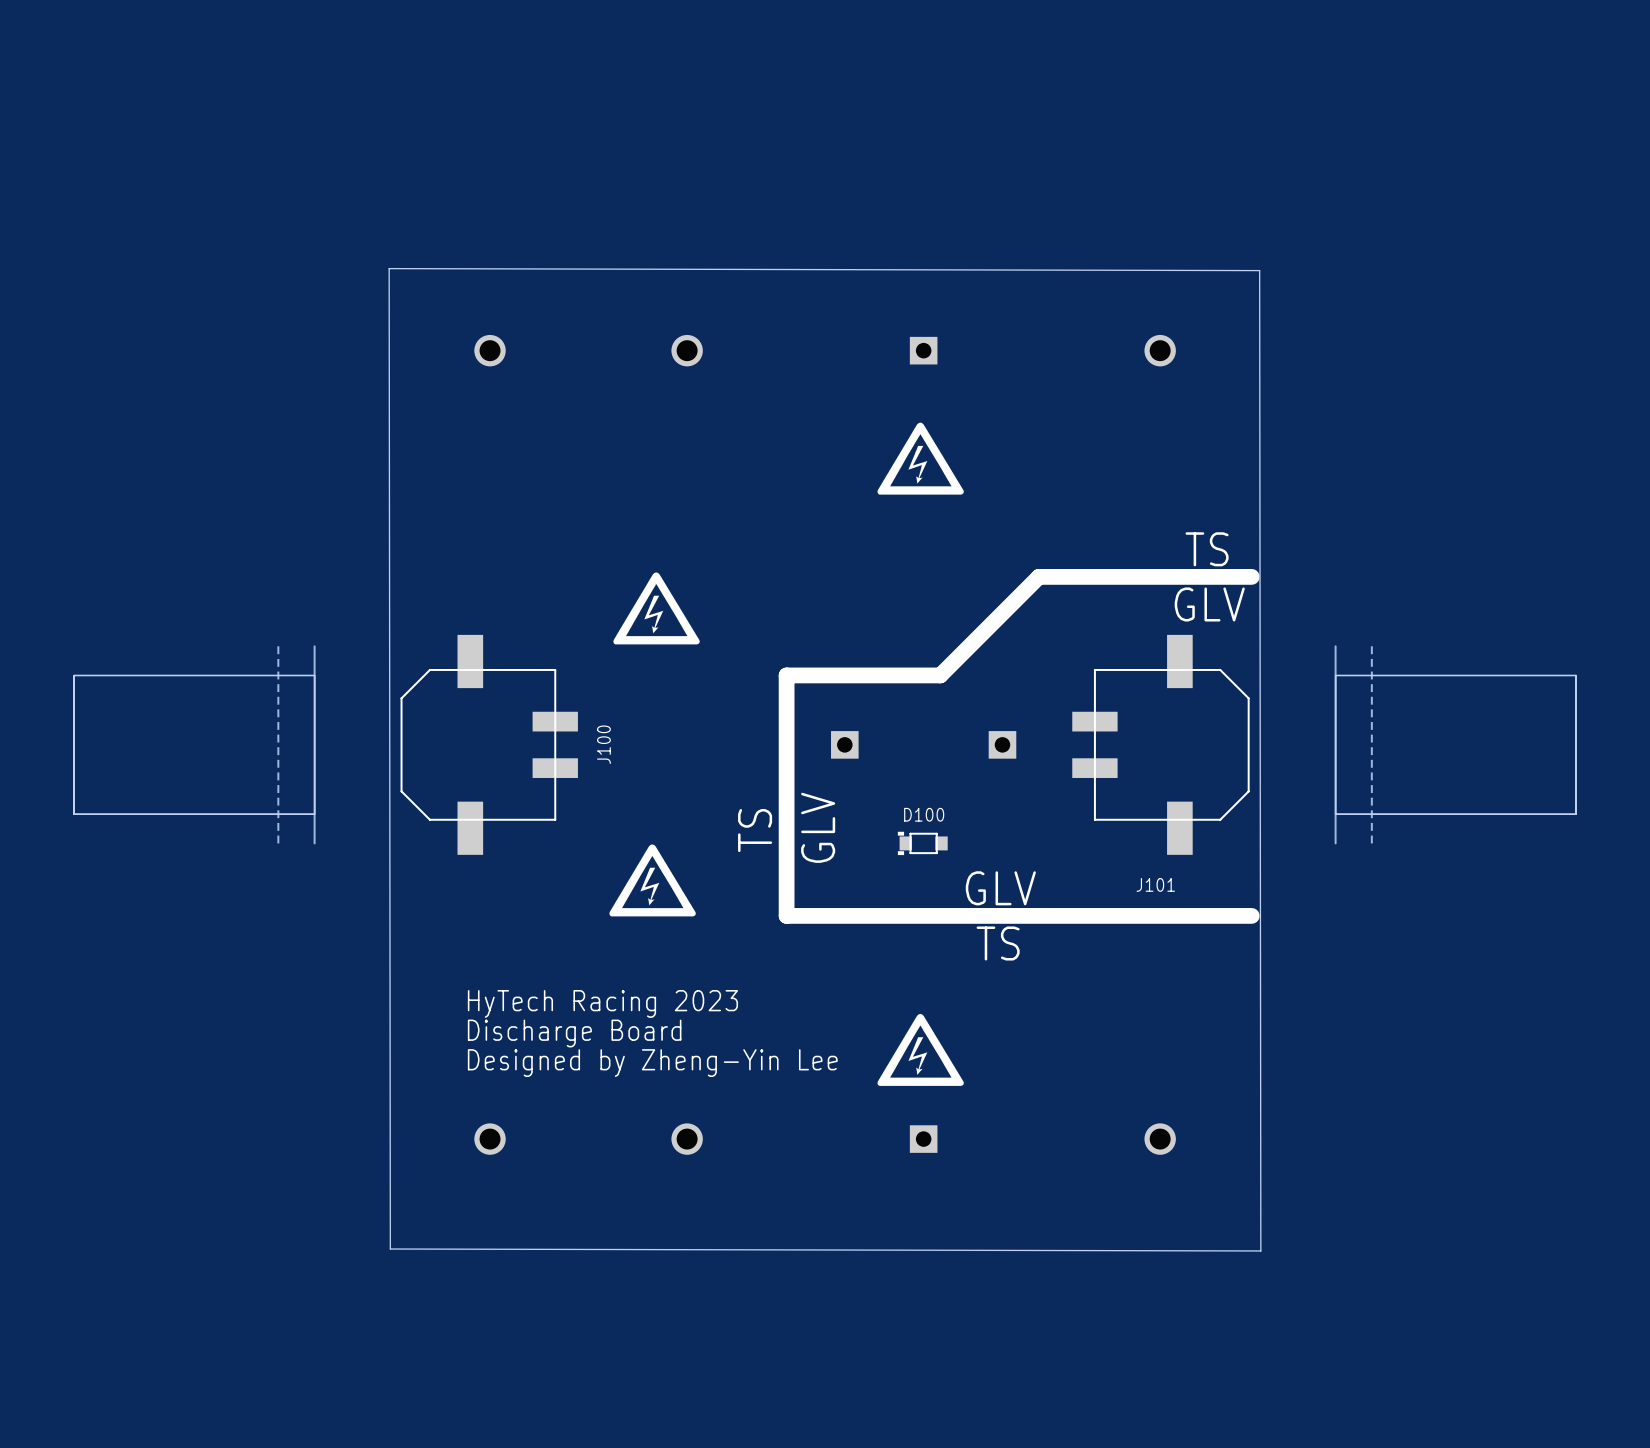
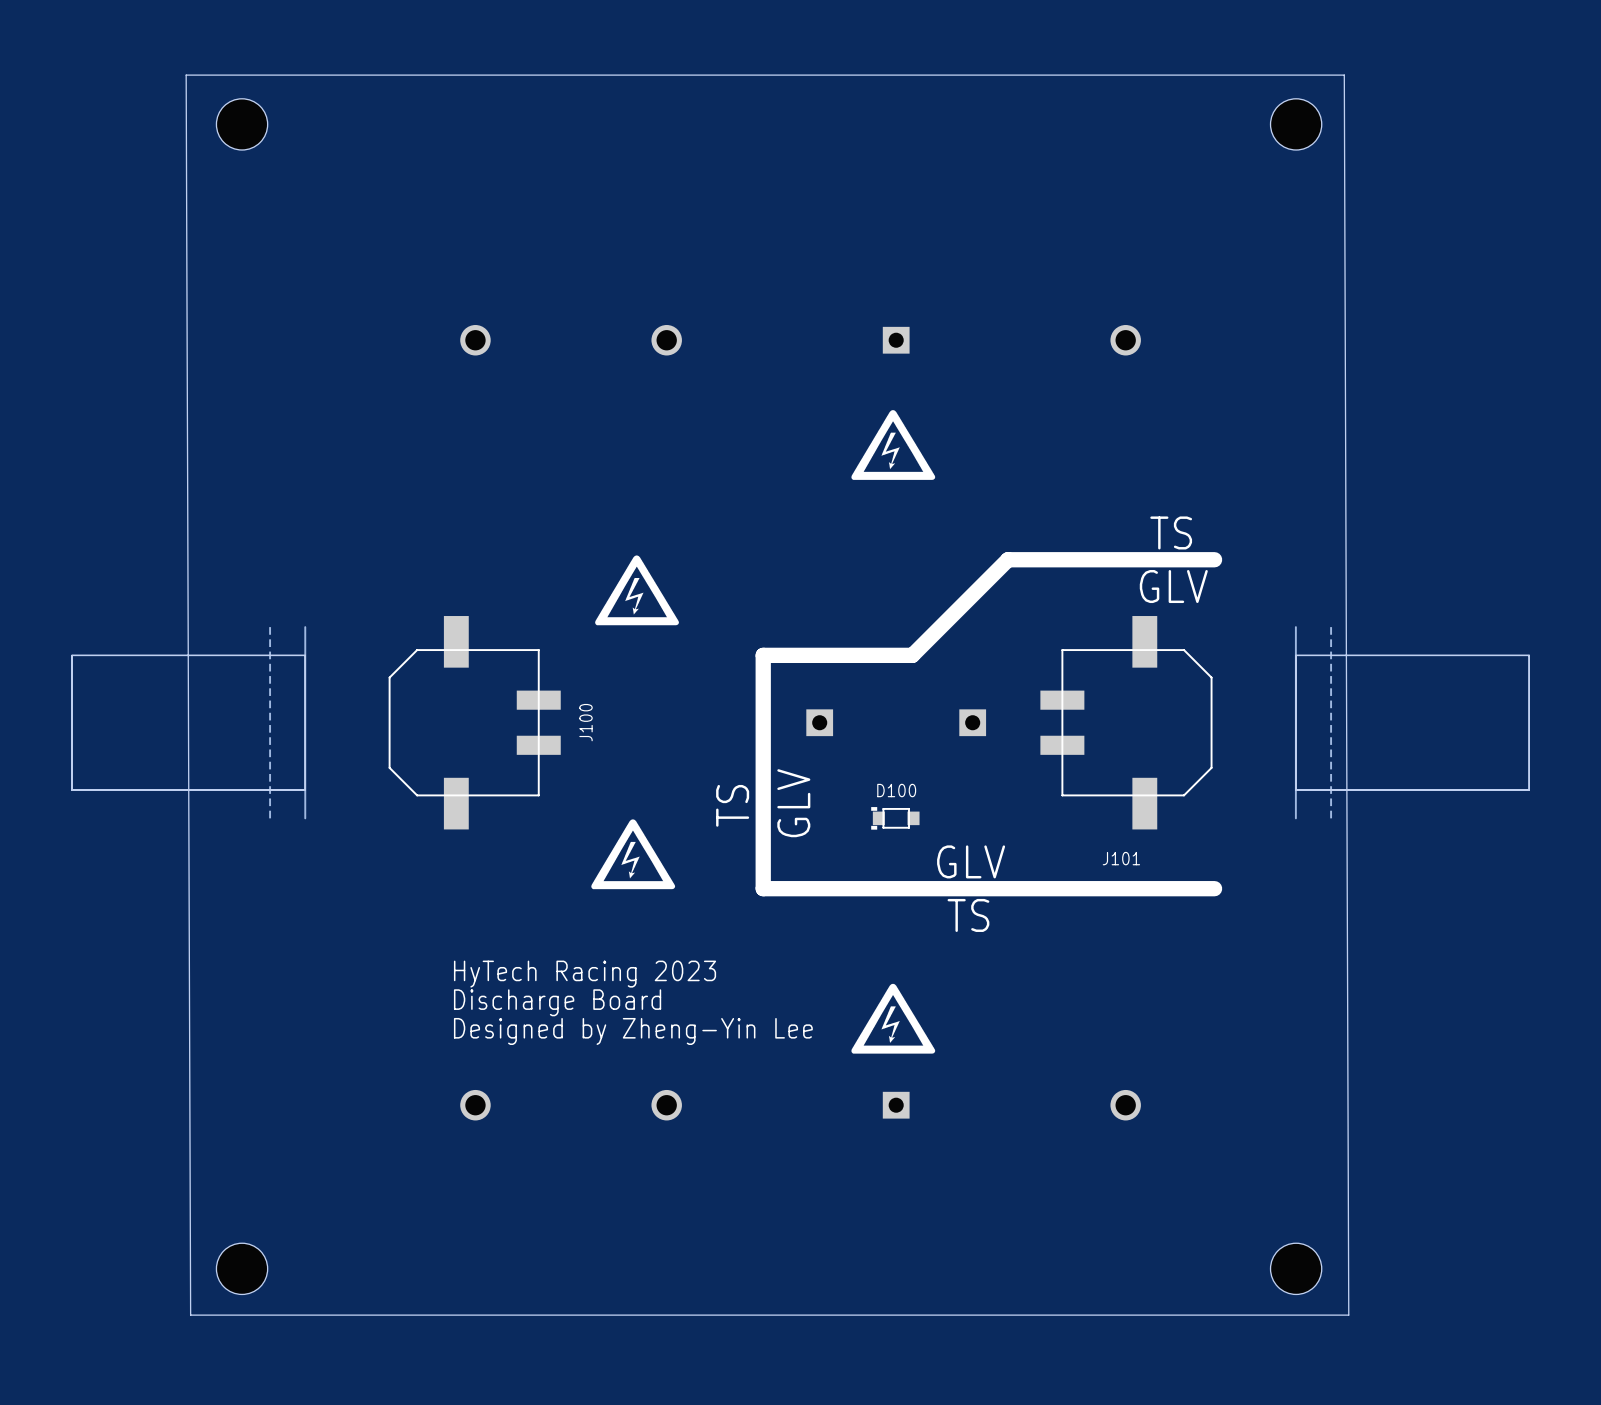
part: none -> (242, 124)
part: none -> (1296, 124)
board edge: (389, 268) (390, 1249) (1260, 1250) (1259, 270) (389, 268) -> (1344, 75) (1348, 1315) (190, 1315) (186, 75) (1344, 75)
part: none -> (242, 1268)
part: none -> (1296, 1268)

